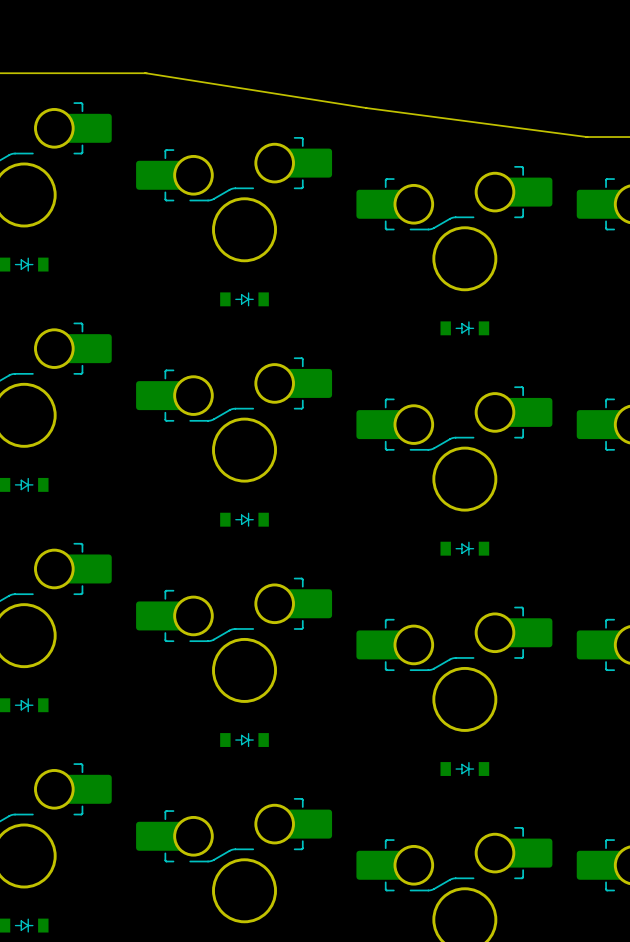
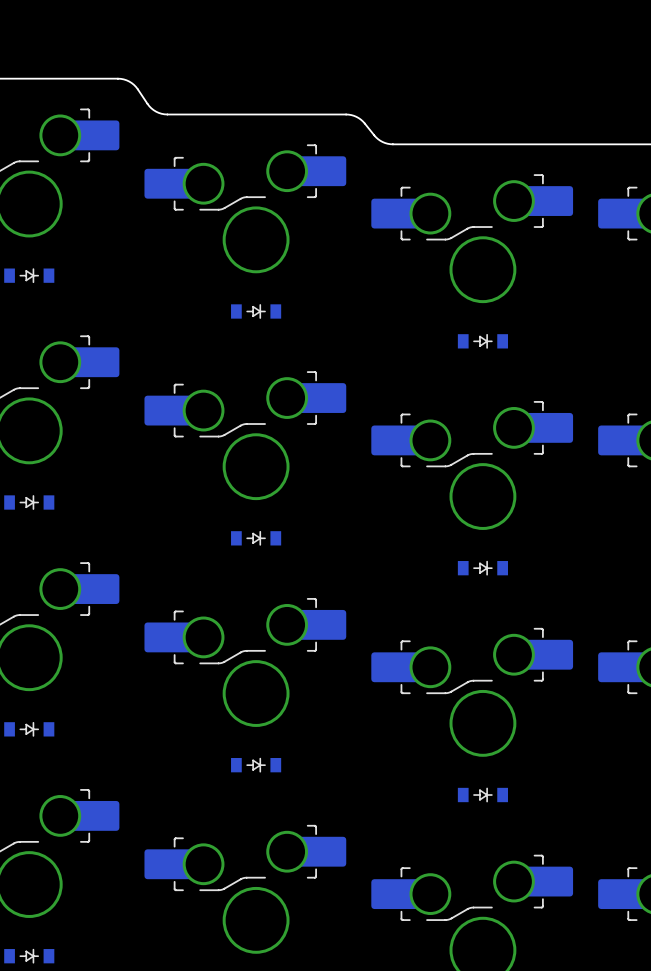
board edge: (110, 73) (146, 73) (366, 108) (587, 137) -> (117, 78) (131, 83) (151, 108) (164, 114) (348, 114) (360, 119) (378, 139) (390, 144) (609, 144)

